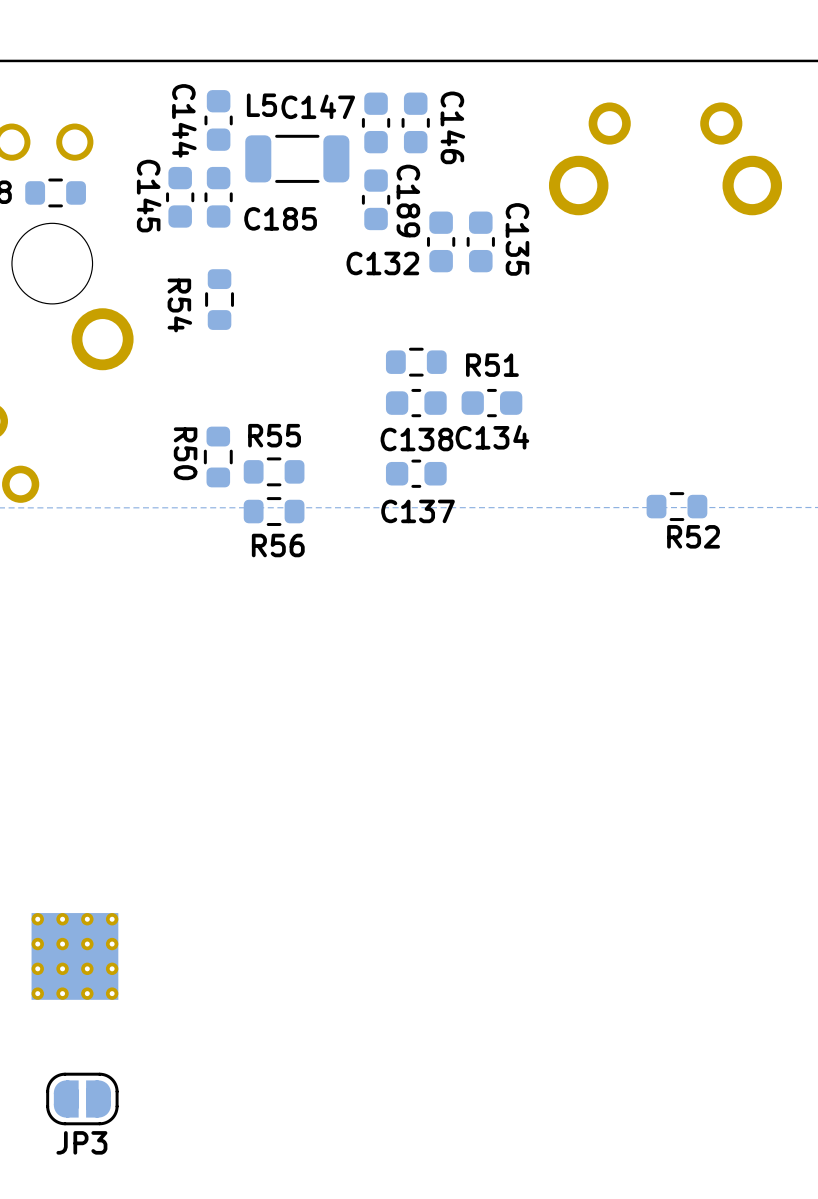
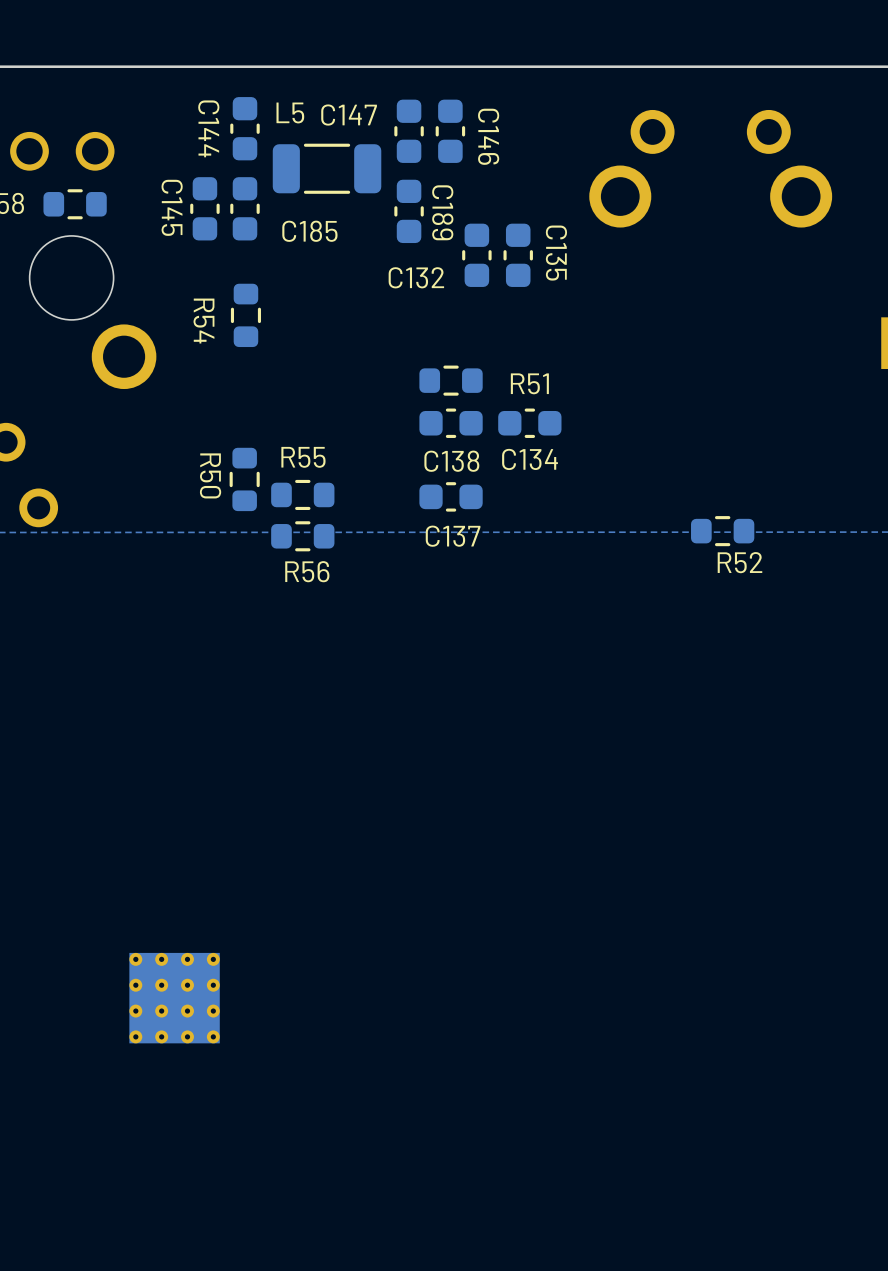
part position: (74, 956) -> (174, 998)
JP3: (82, 1098) -> none

